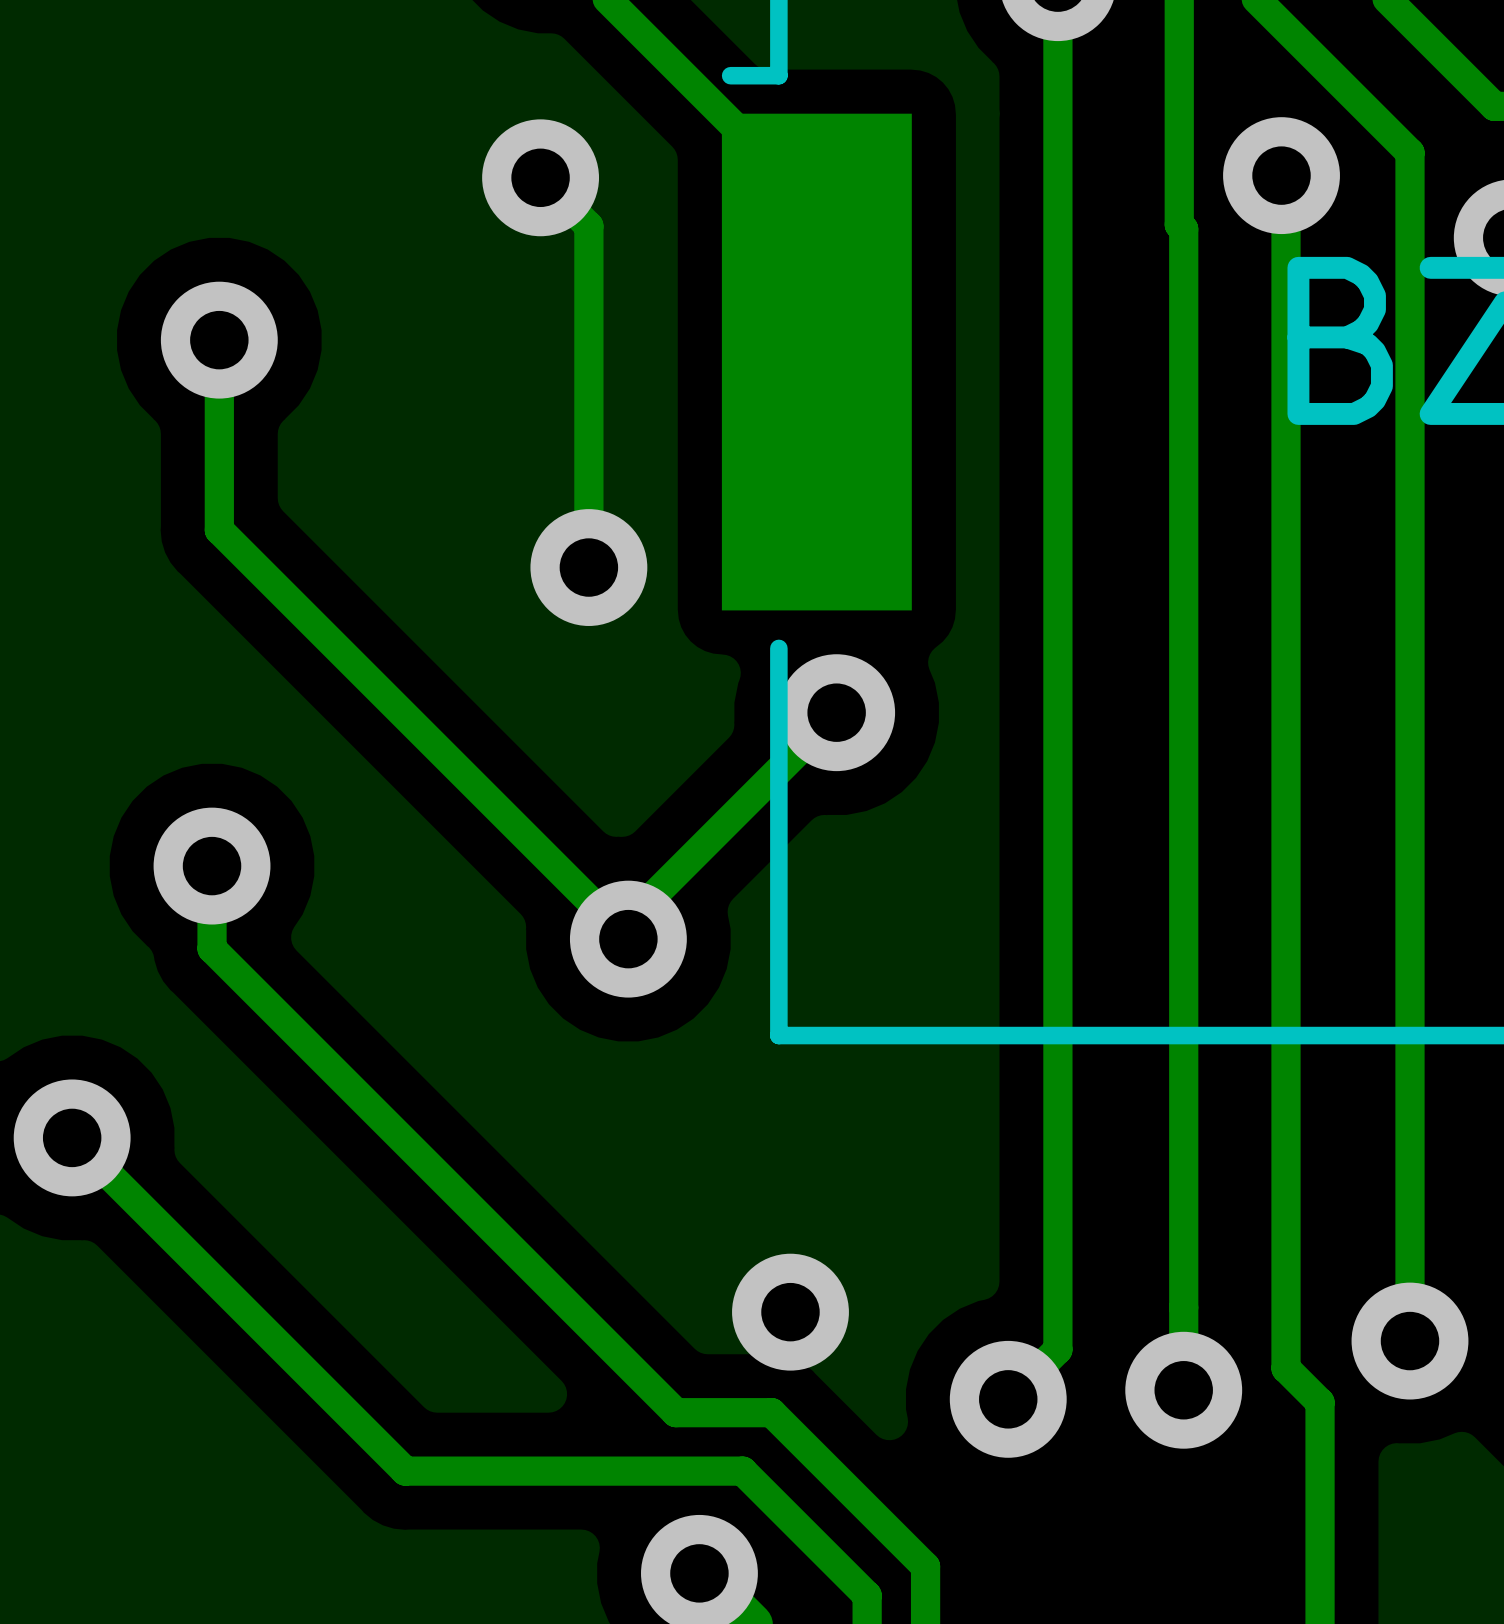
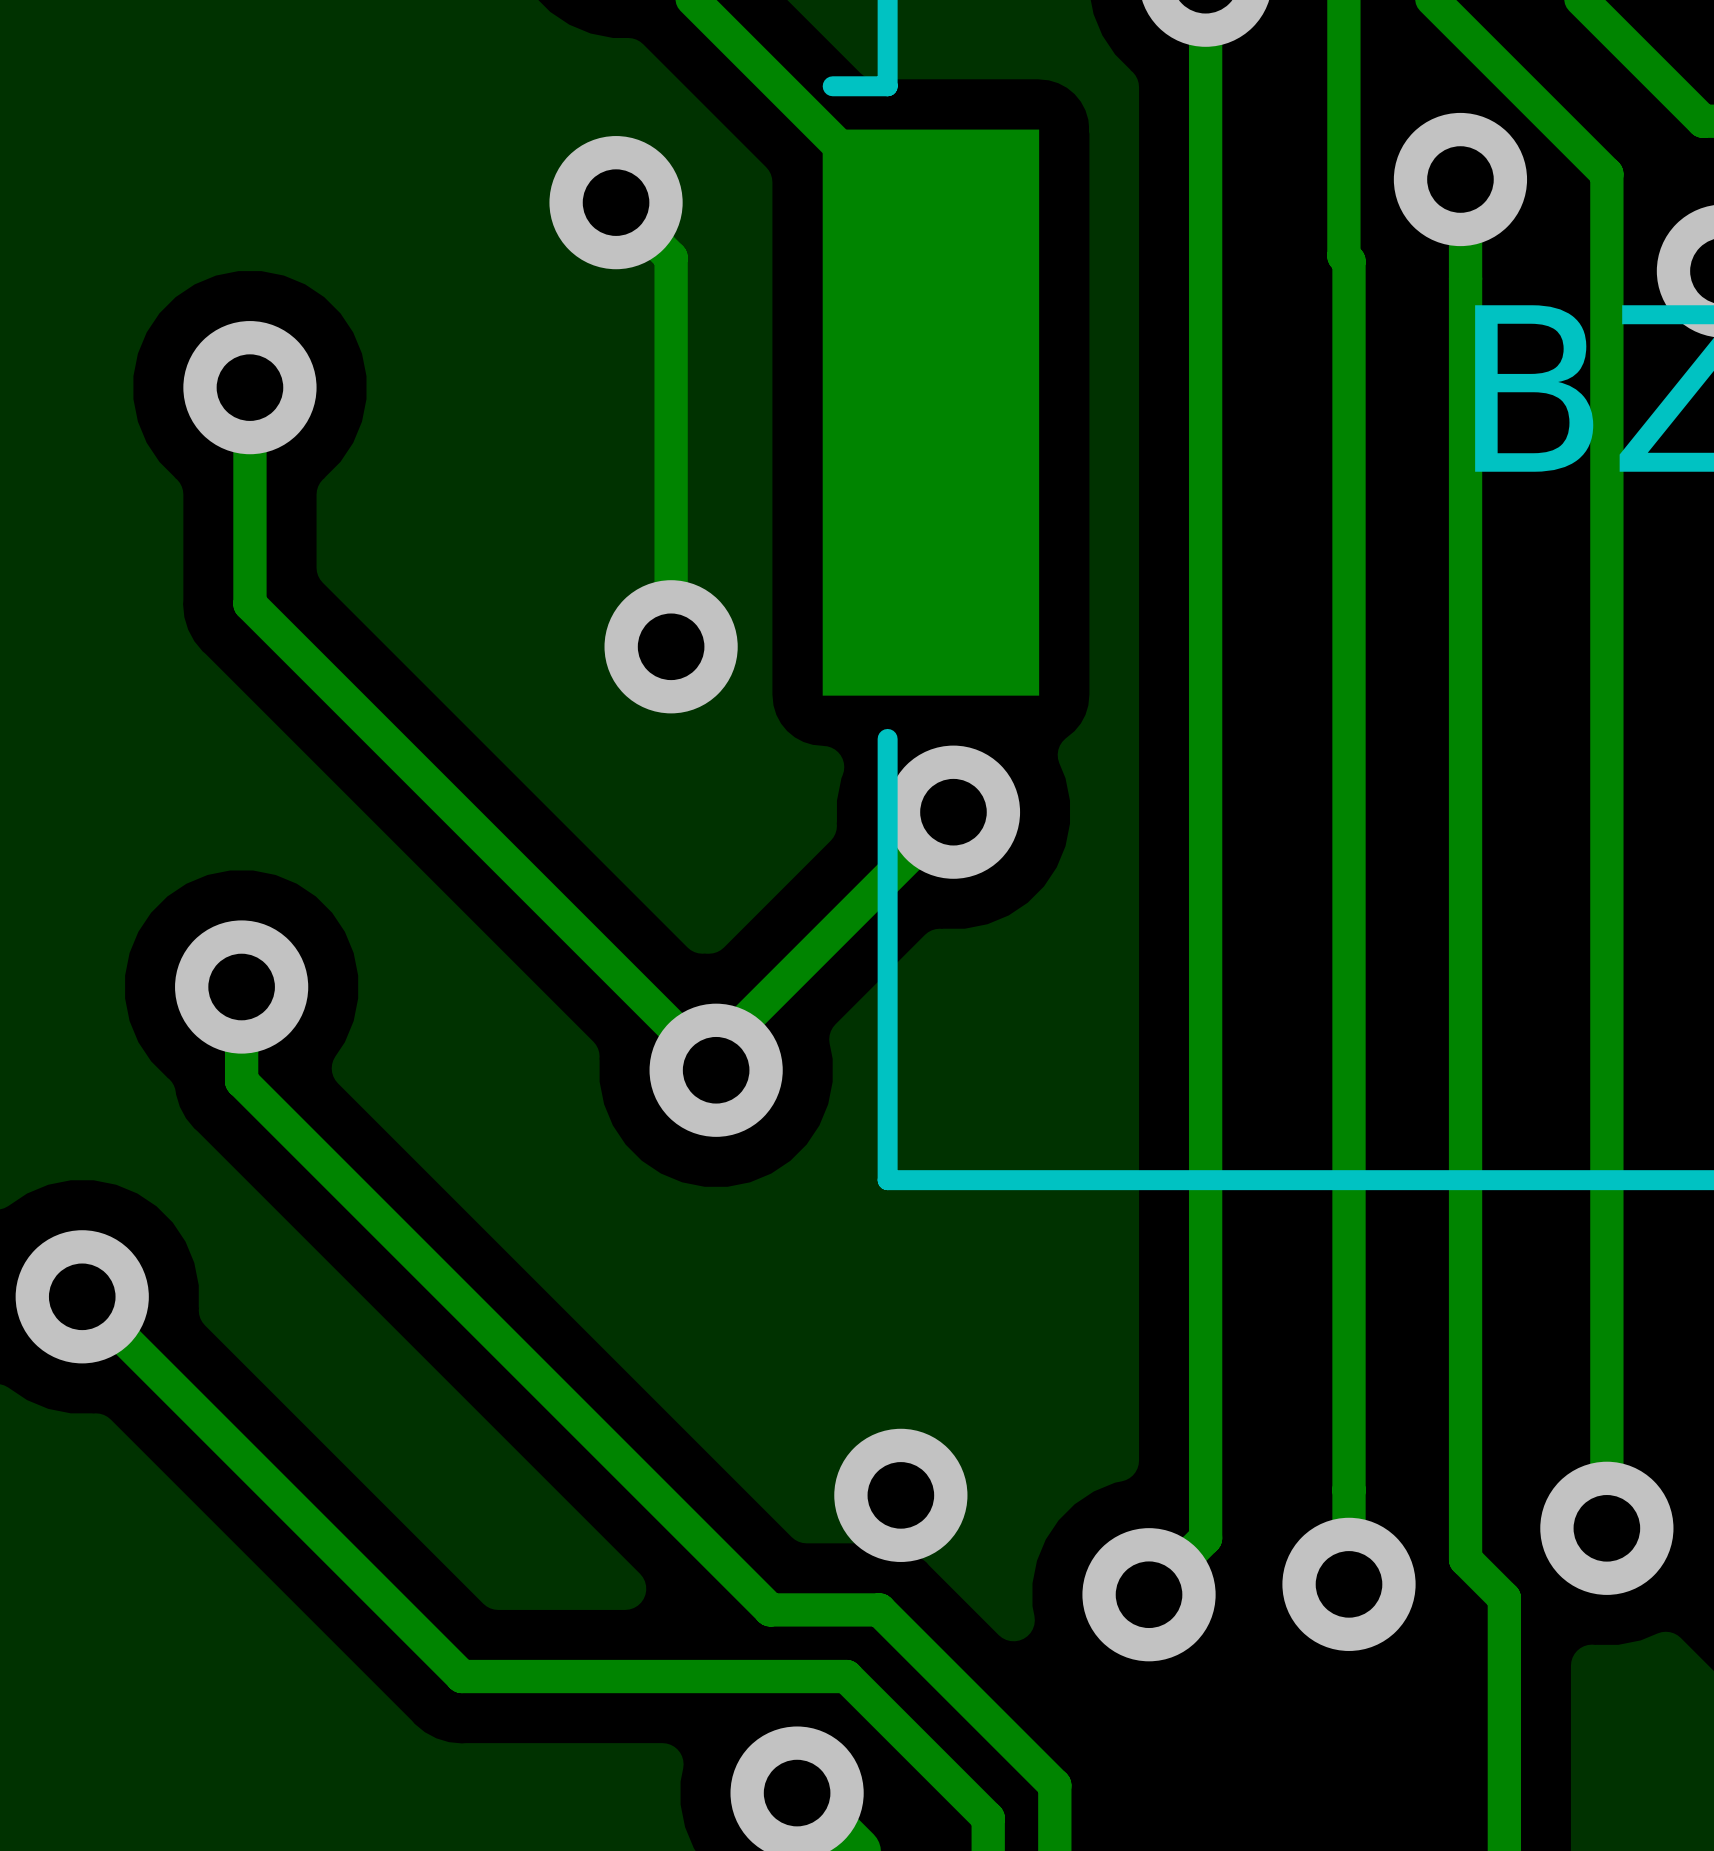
via position: (1281, 175) -> (1460, 179)

